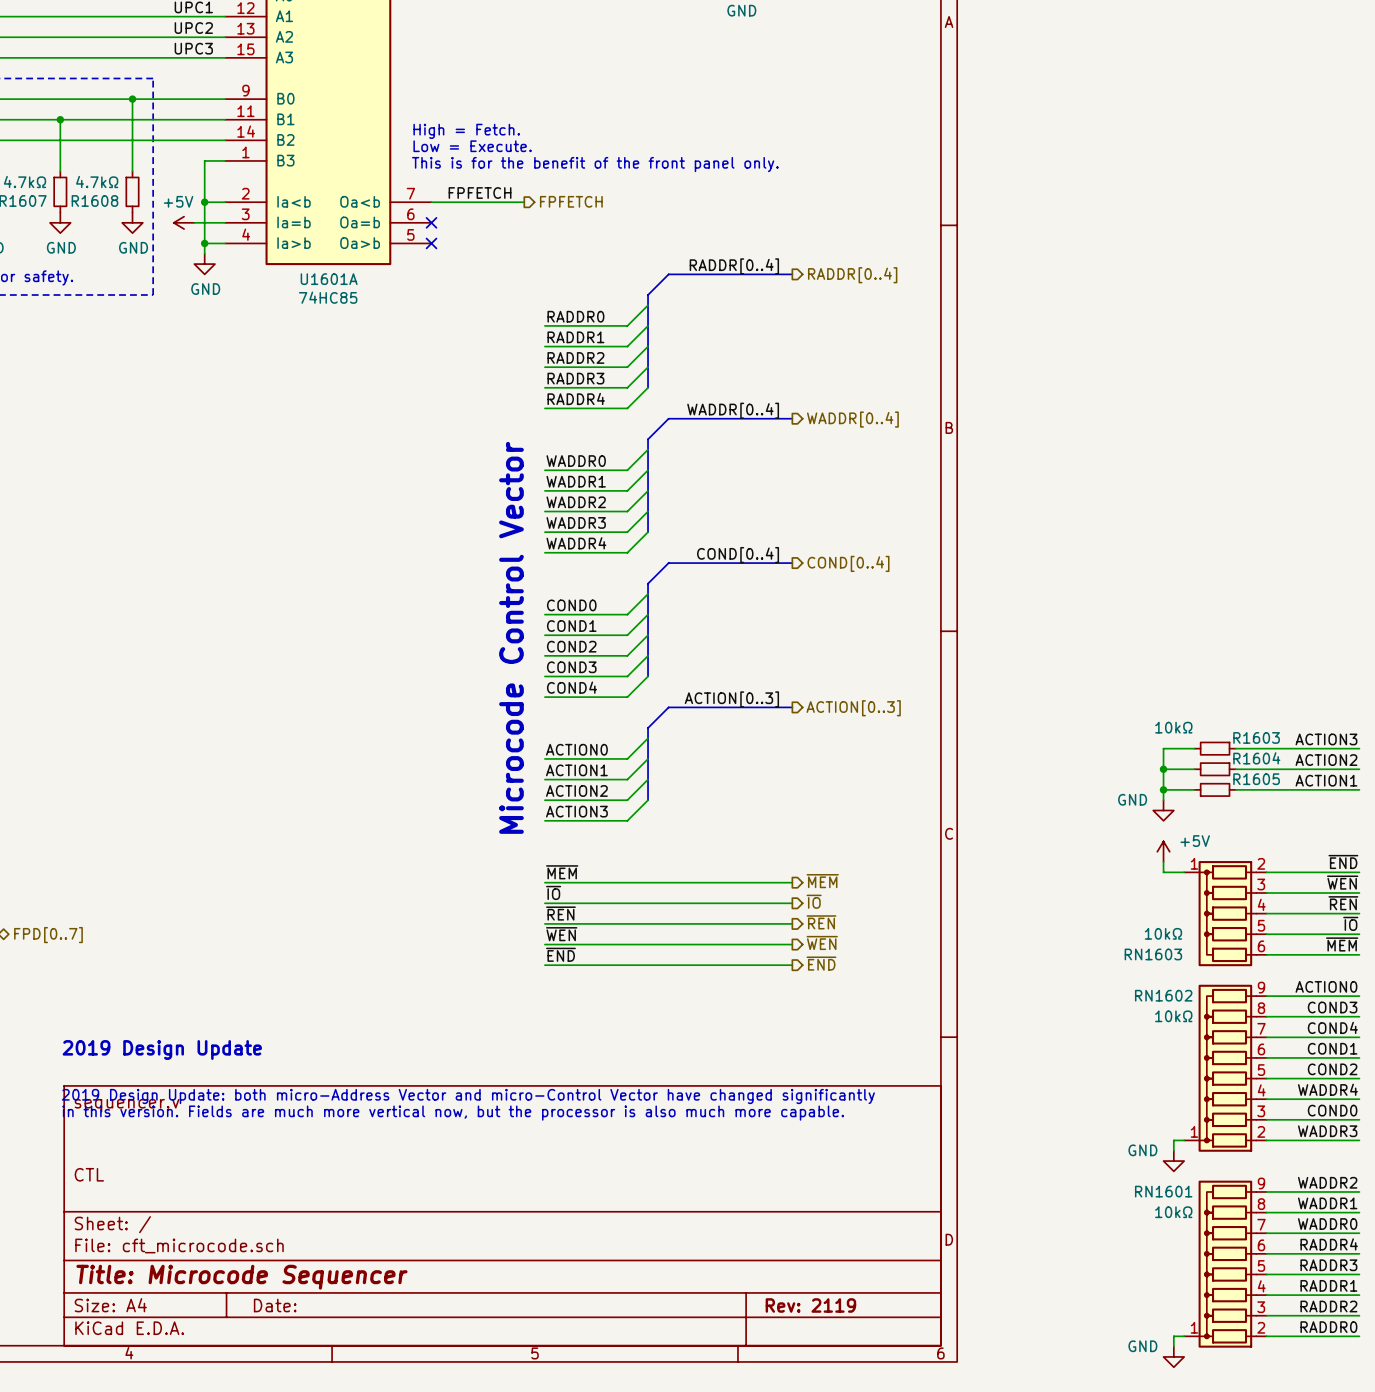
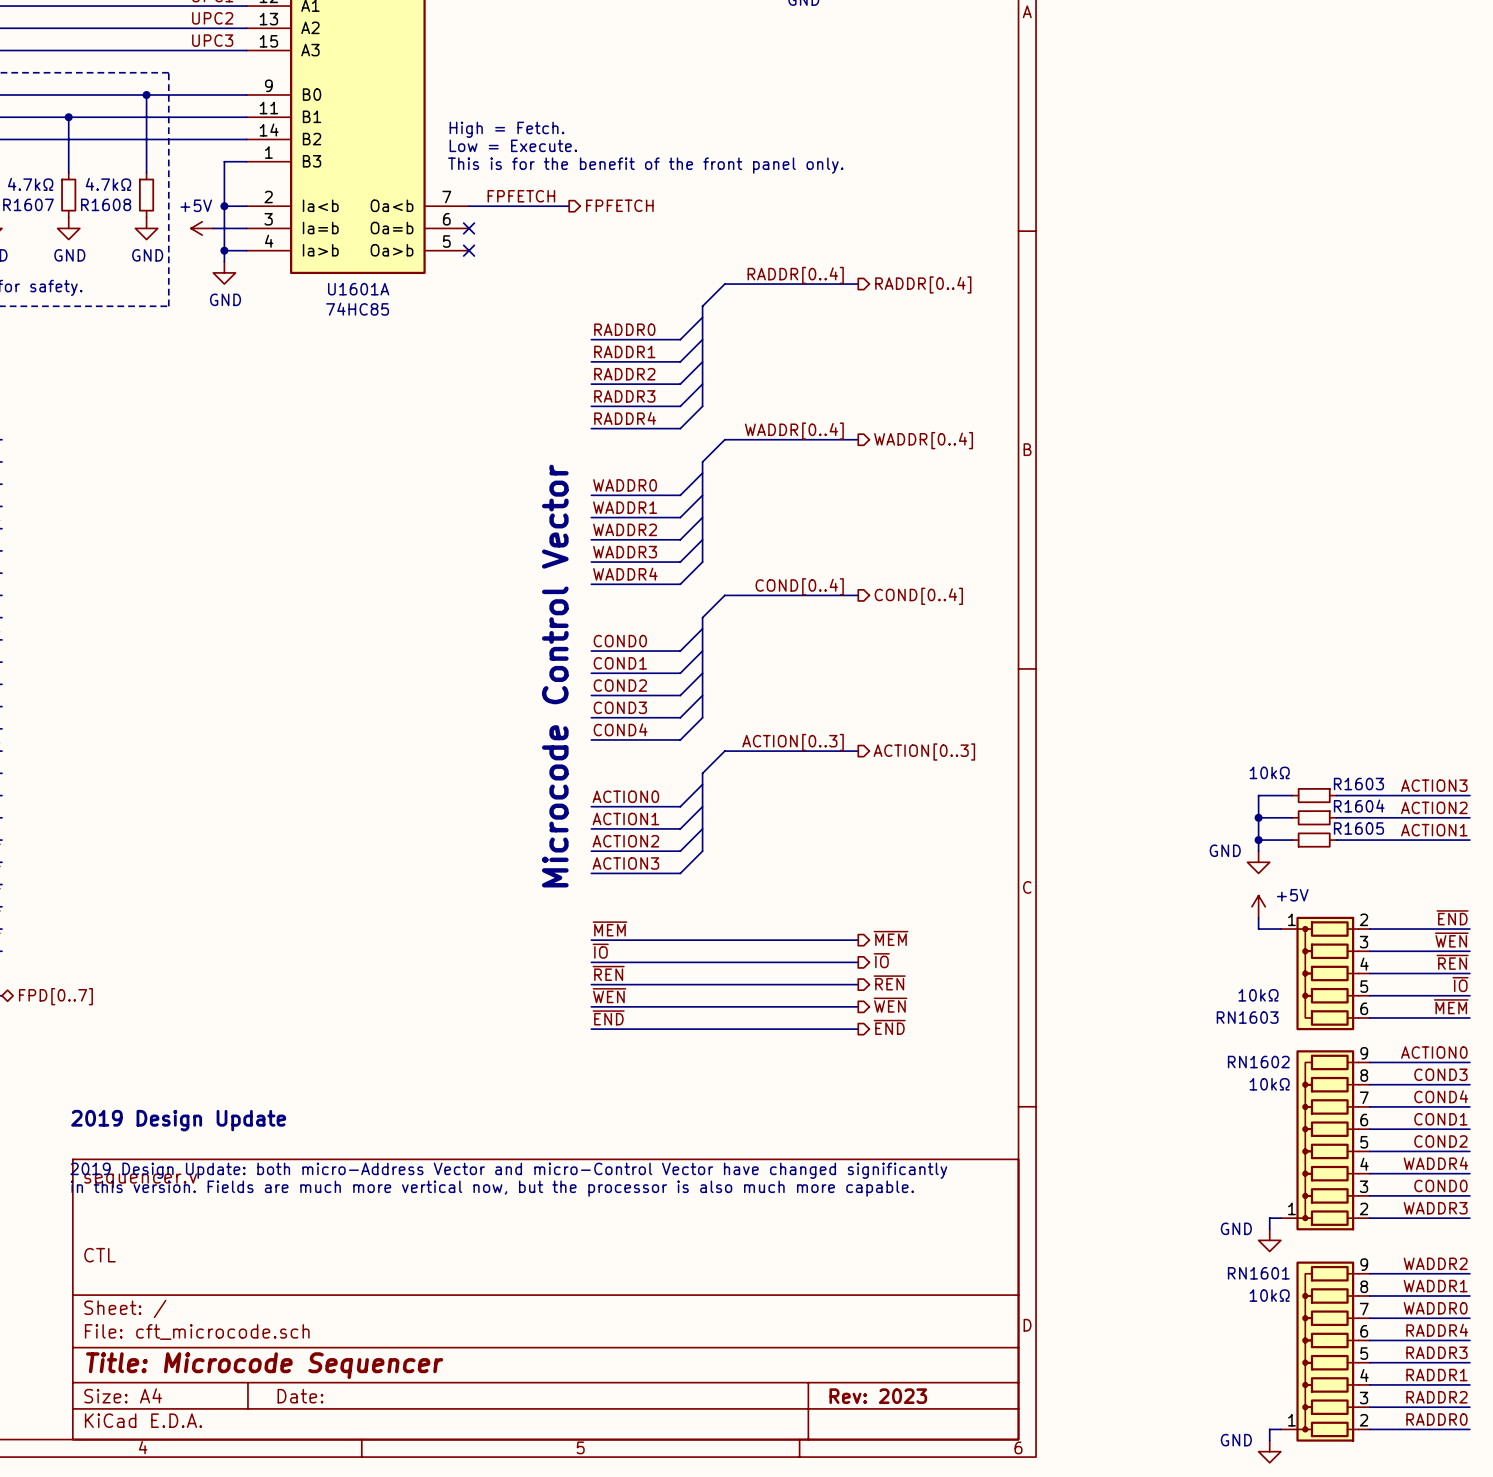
title block: Rev: 2119 (810, 1305) -> Rev: 2023 (878, 1396)

